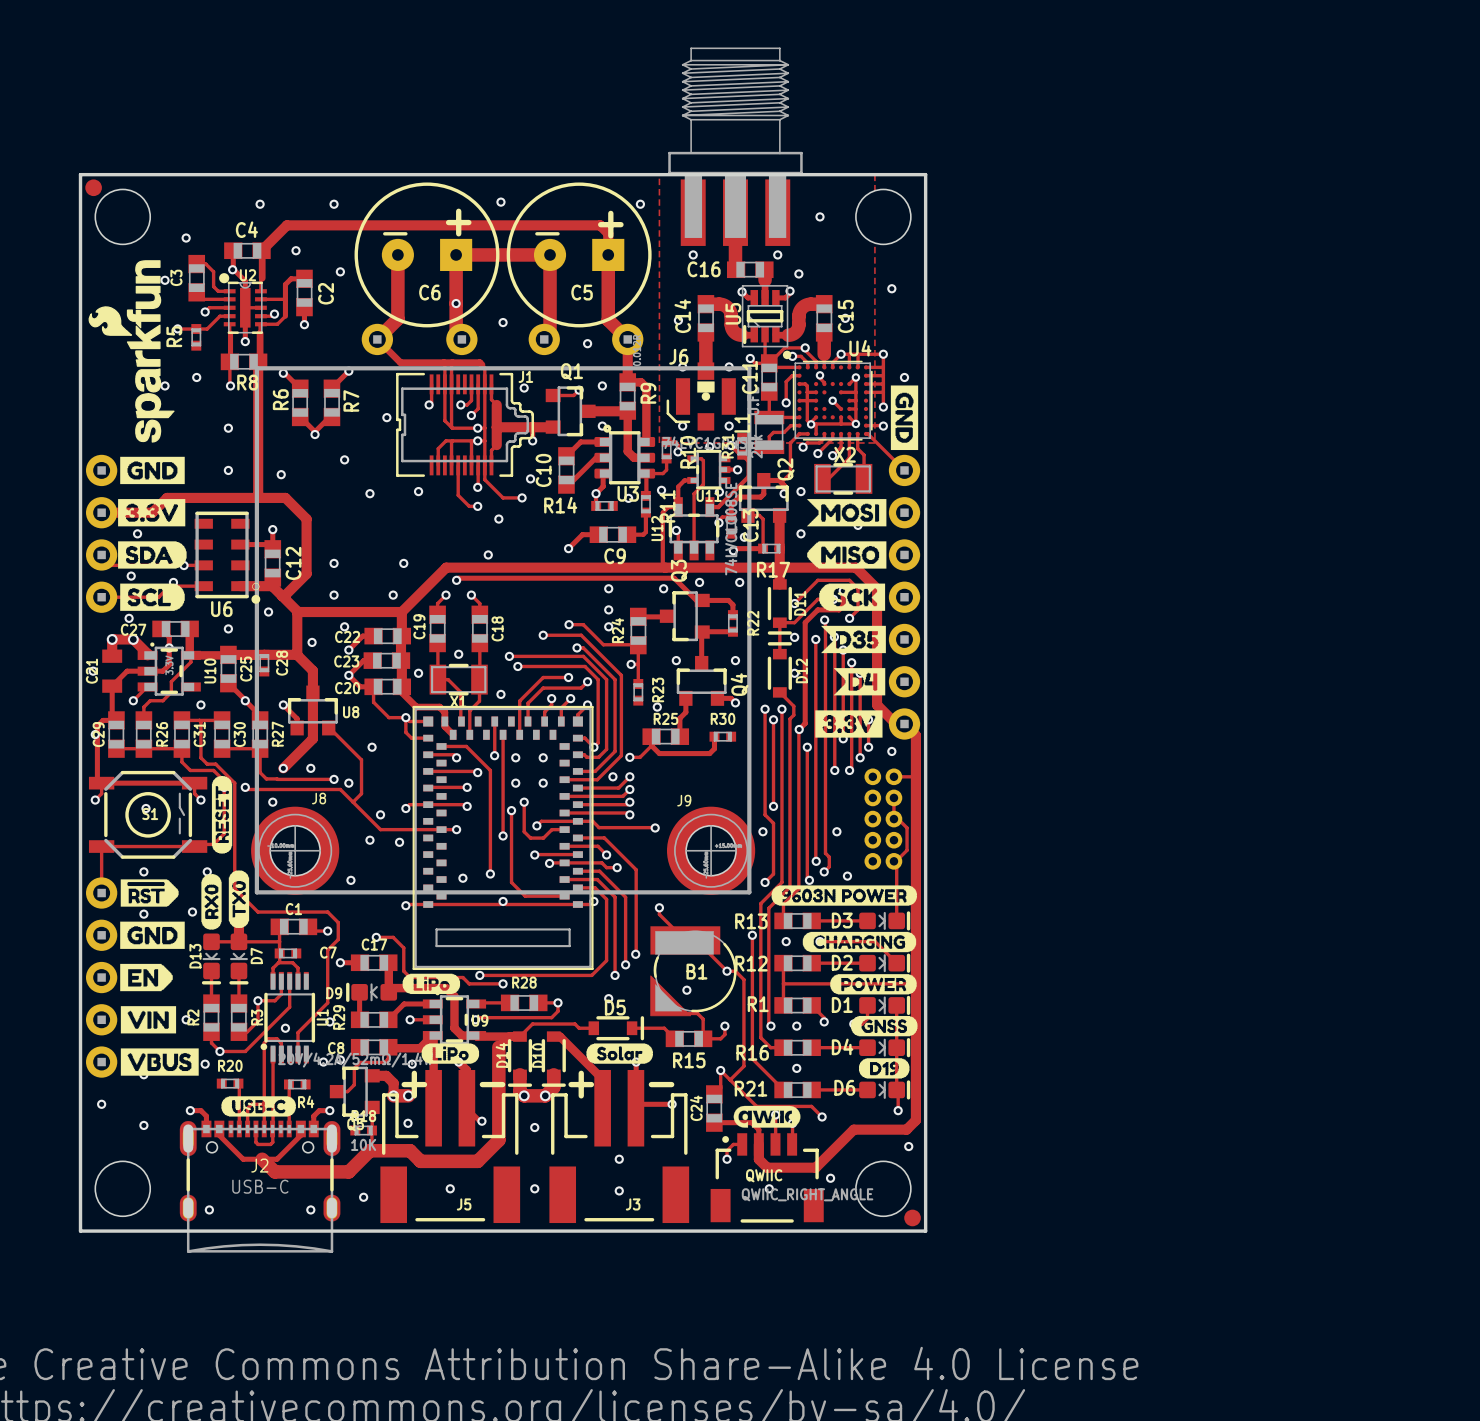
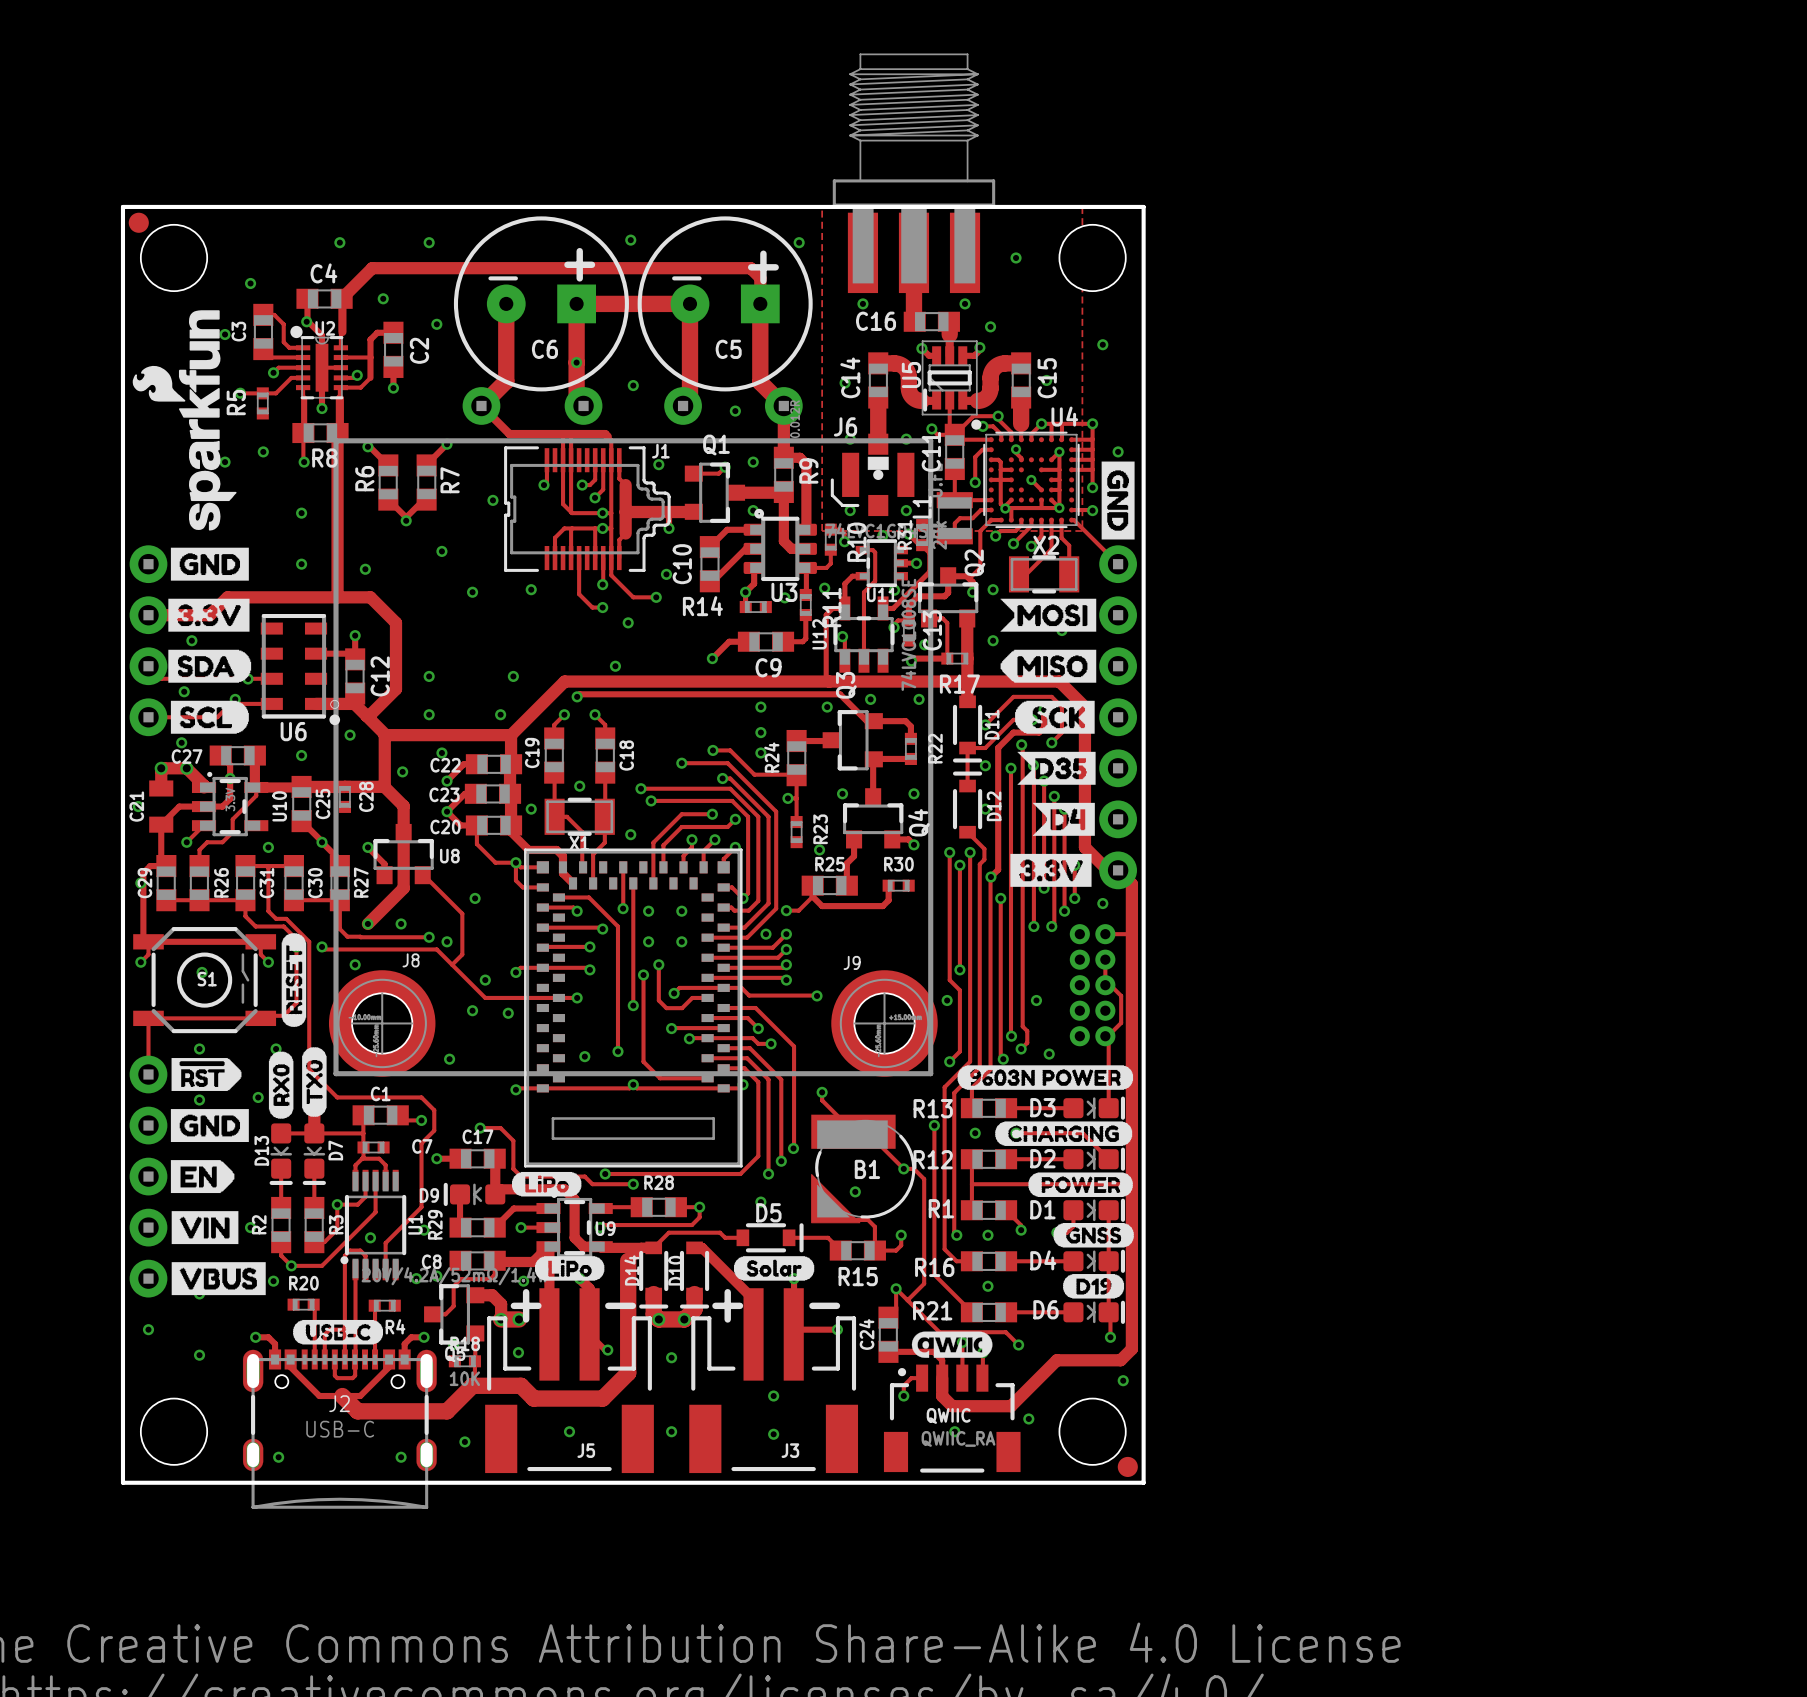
QWIIC value: QWIIC_RIGHT_ANGLE (807, 1194) -> QWIIC_RA (958, 1438)

